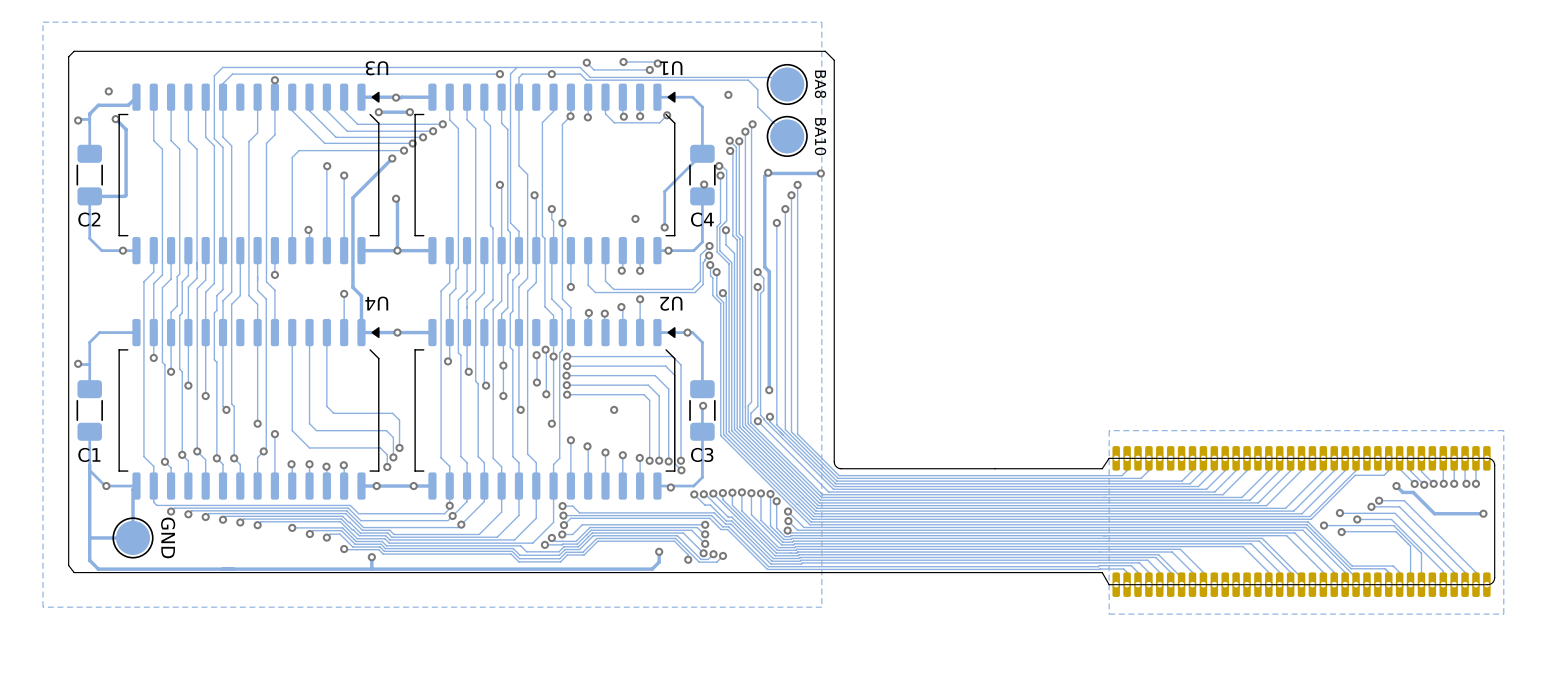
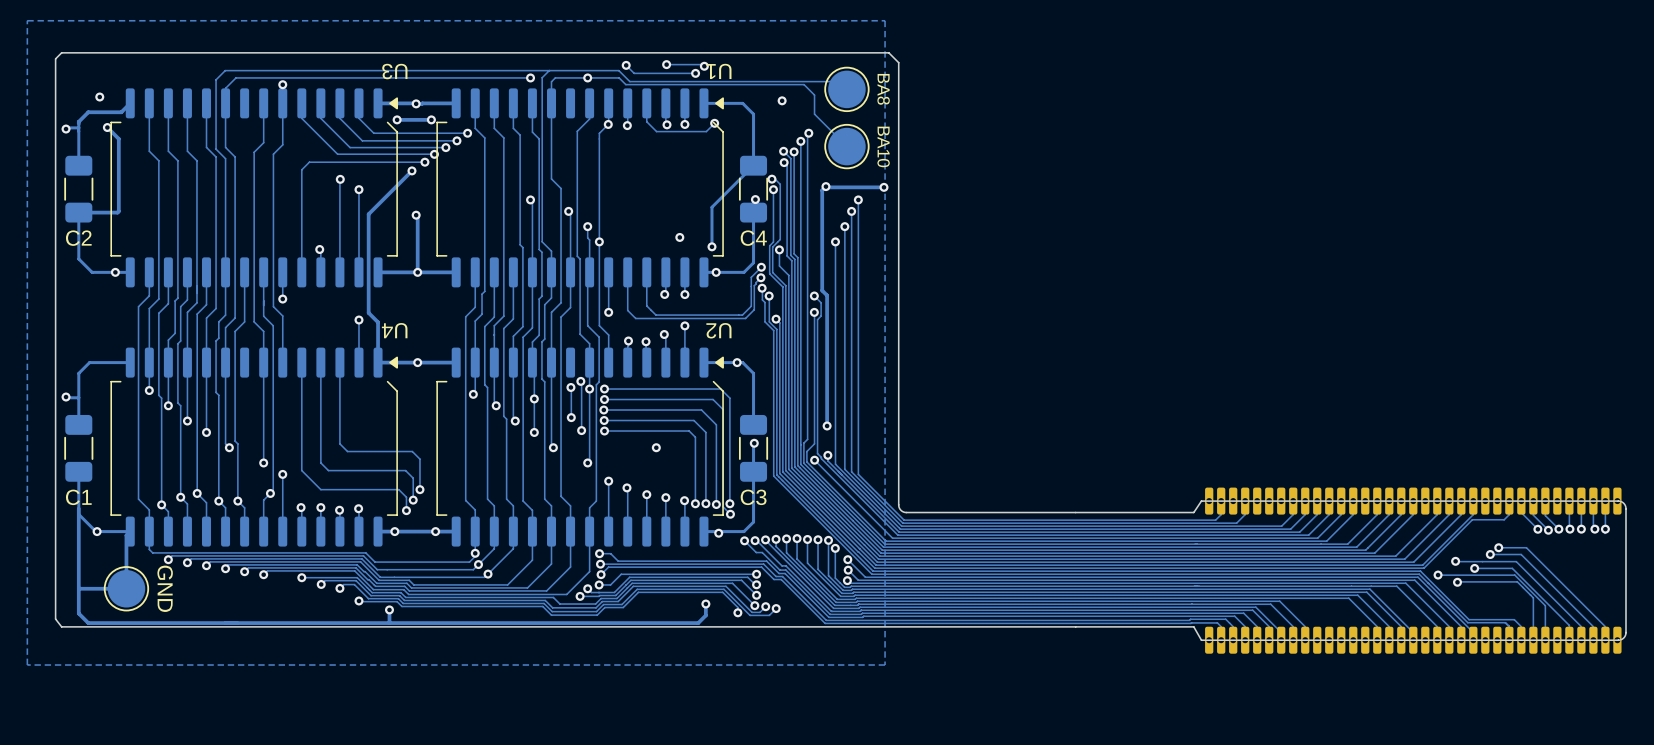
zone outline: (1503, 430) (1109, 430) (1109, 614) (1503, 614) (1503, 430) -> none
track: (1396, 486) (1402, 492) (1413, 492) (1434, 513) (1483, 513) -> none
via: (1396, 486) -> none
via: (1483, 513) -> none

